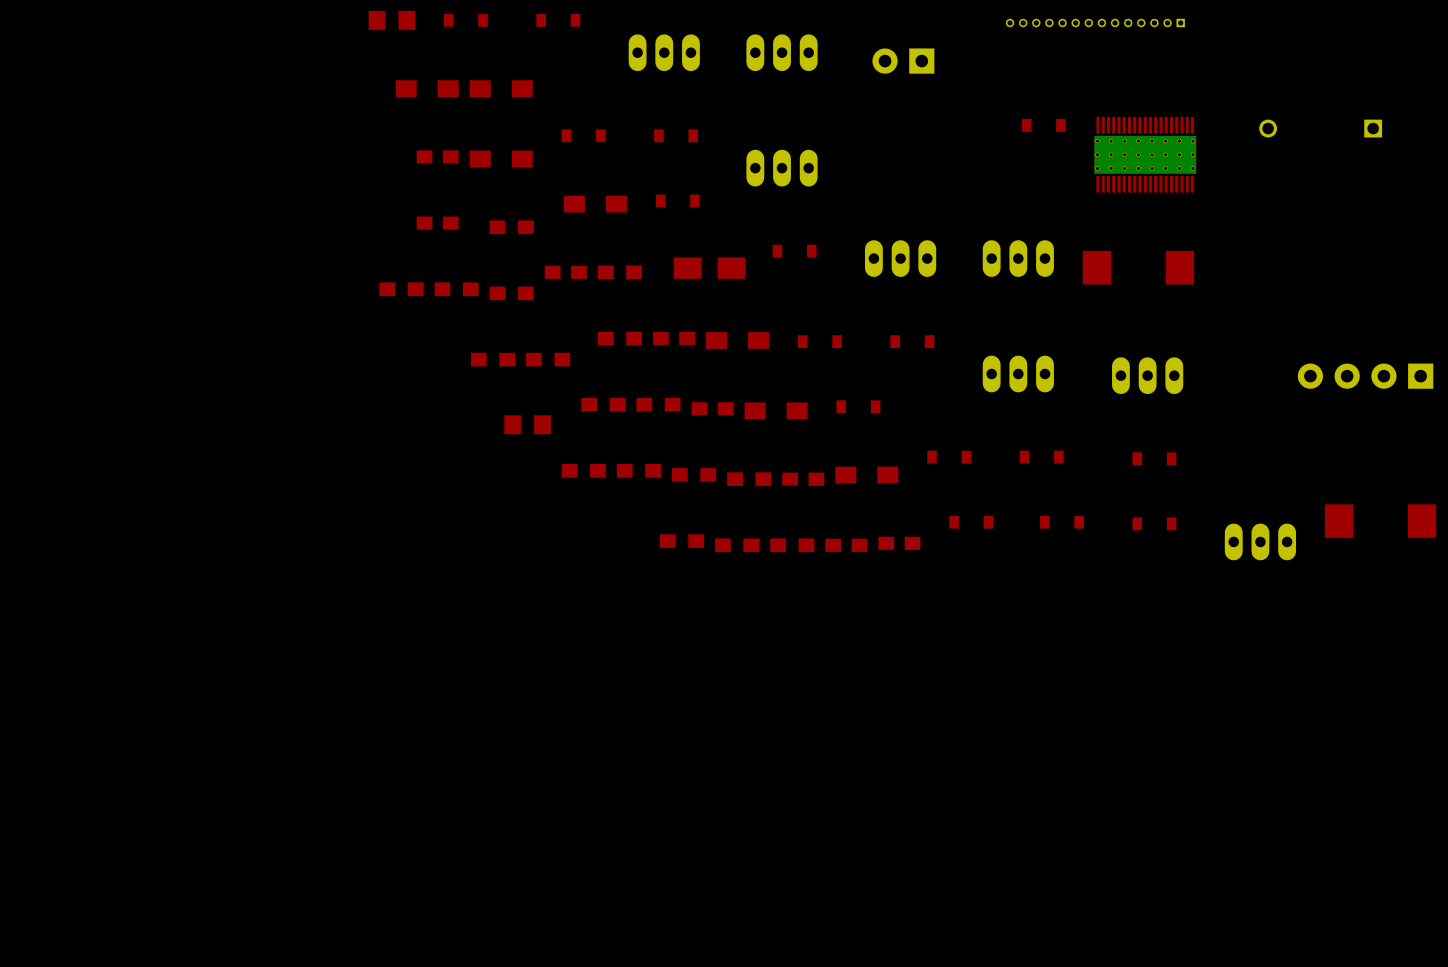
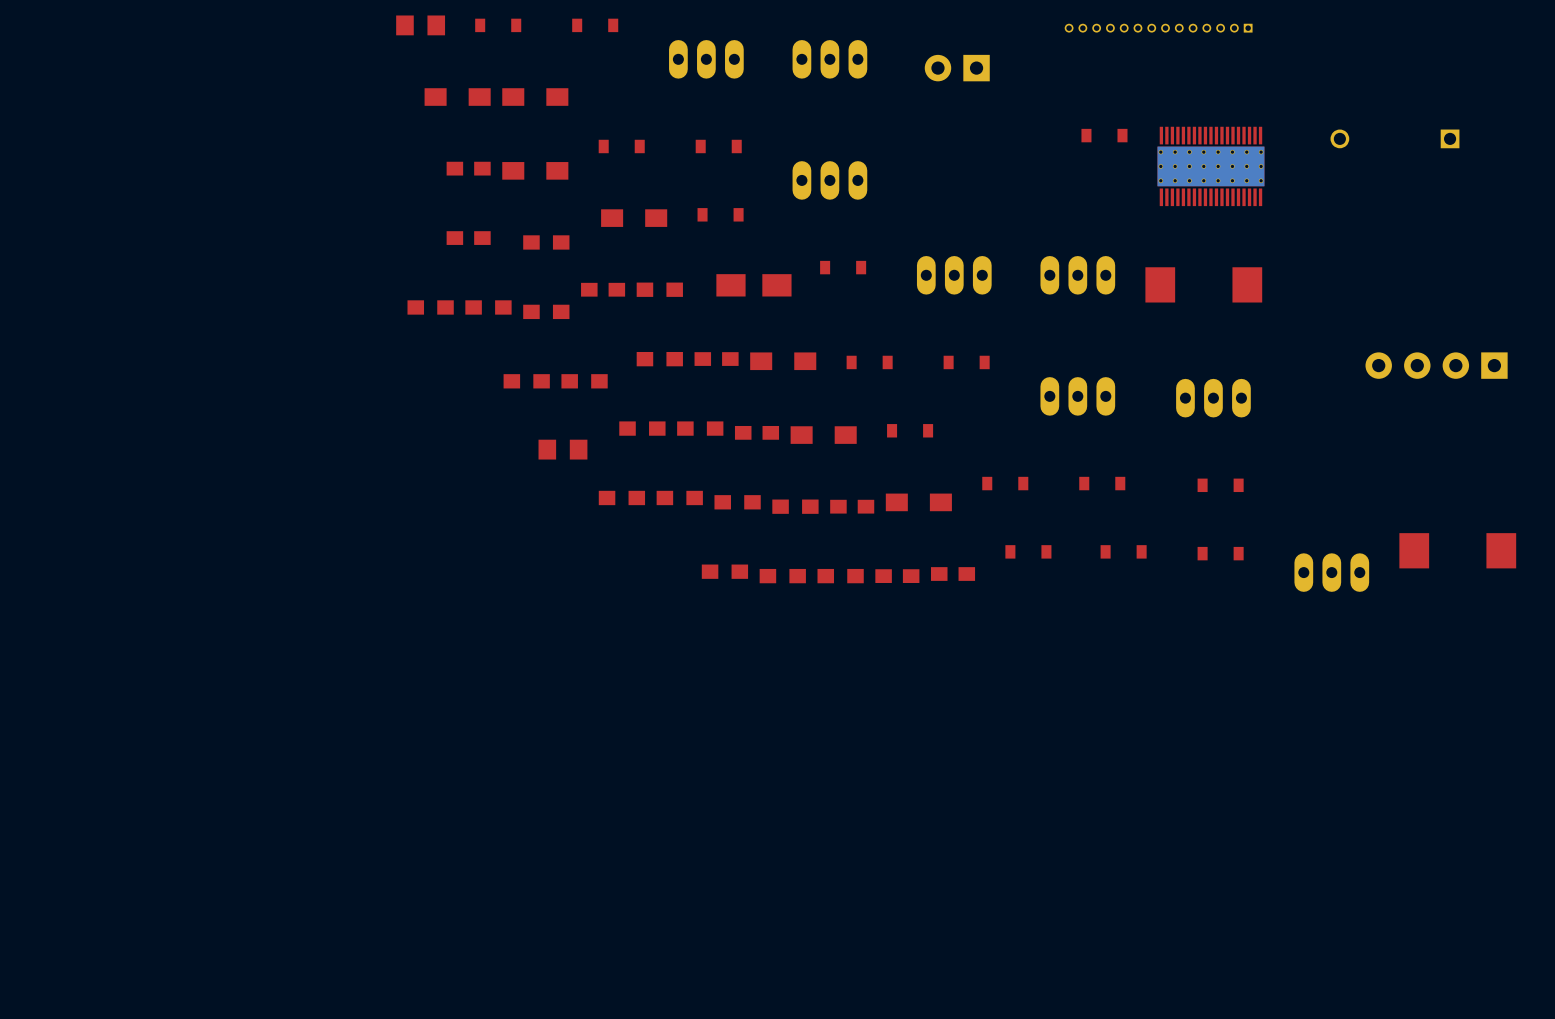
part position: (1365, 376) -> (1436, 365)

